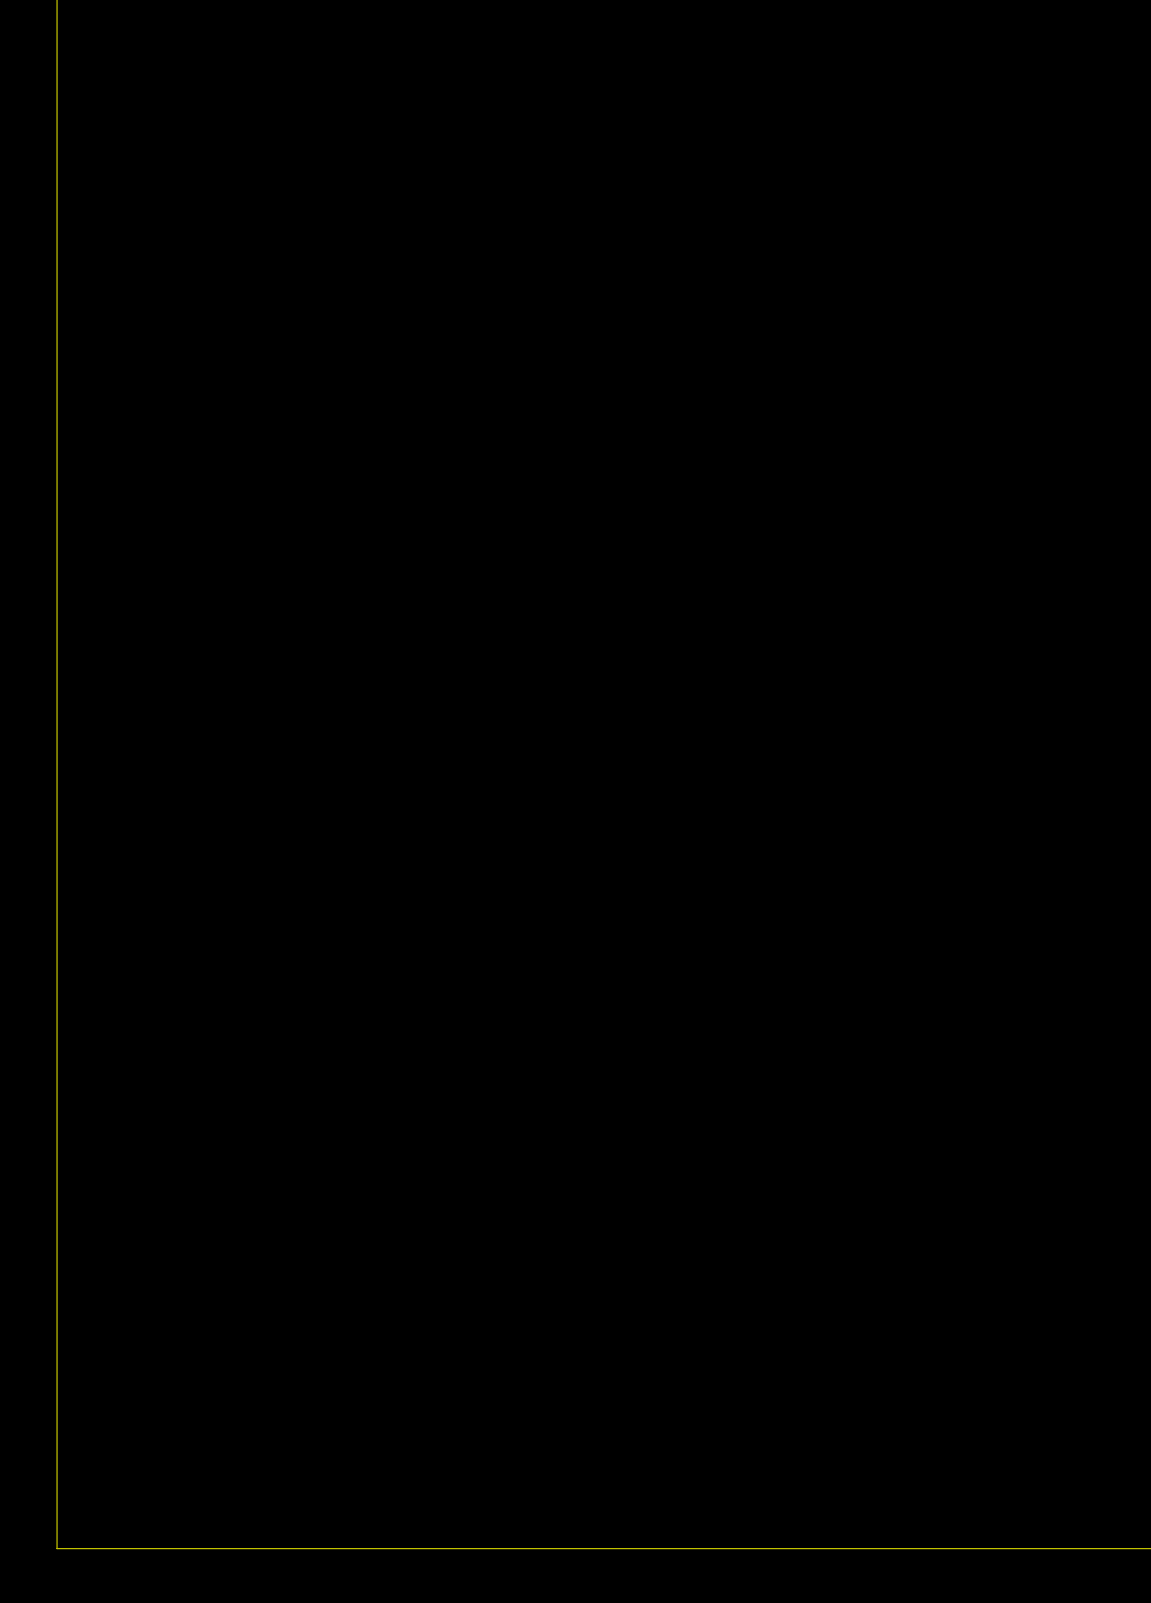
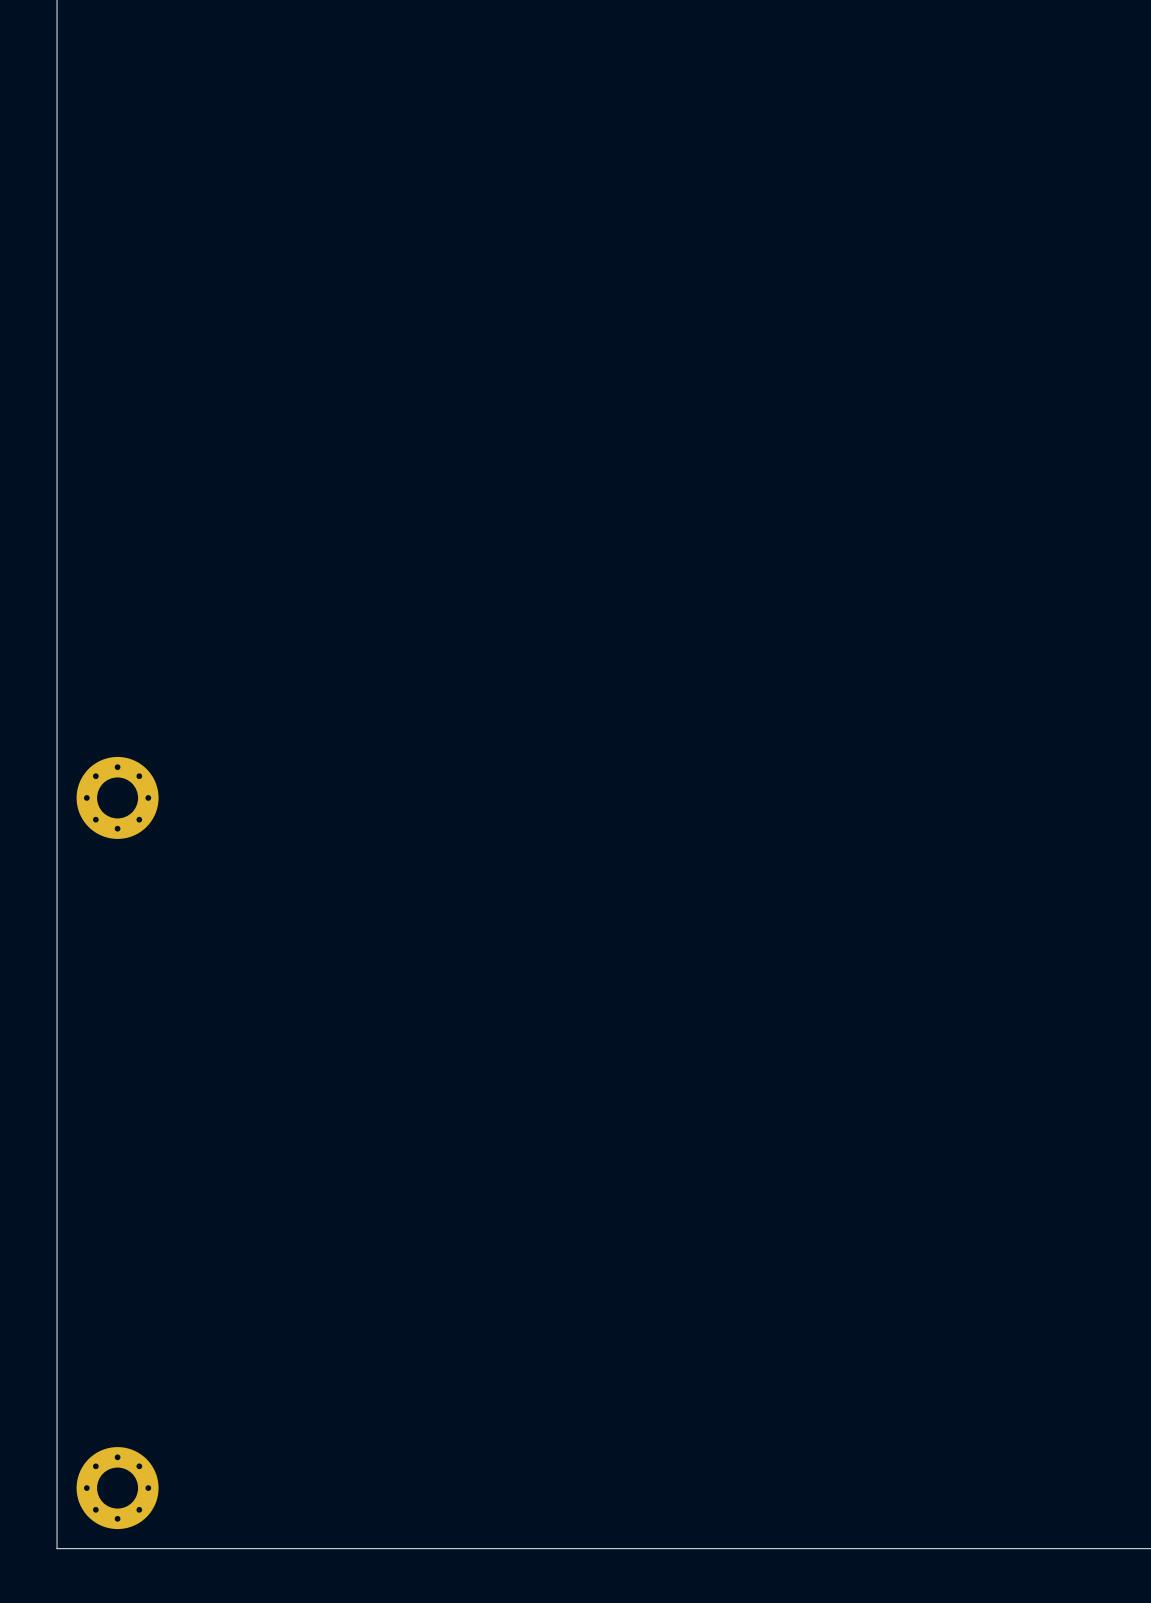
part: none -> (117, 797)
part: none -> (117, 1488)

